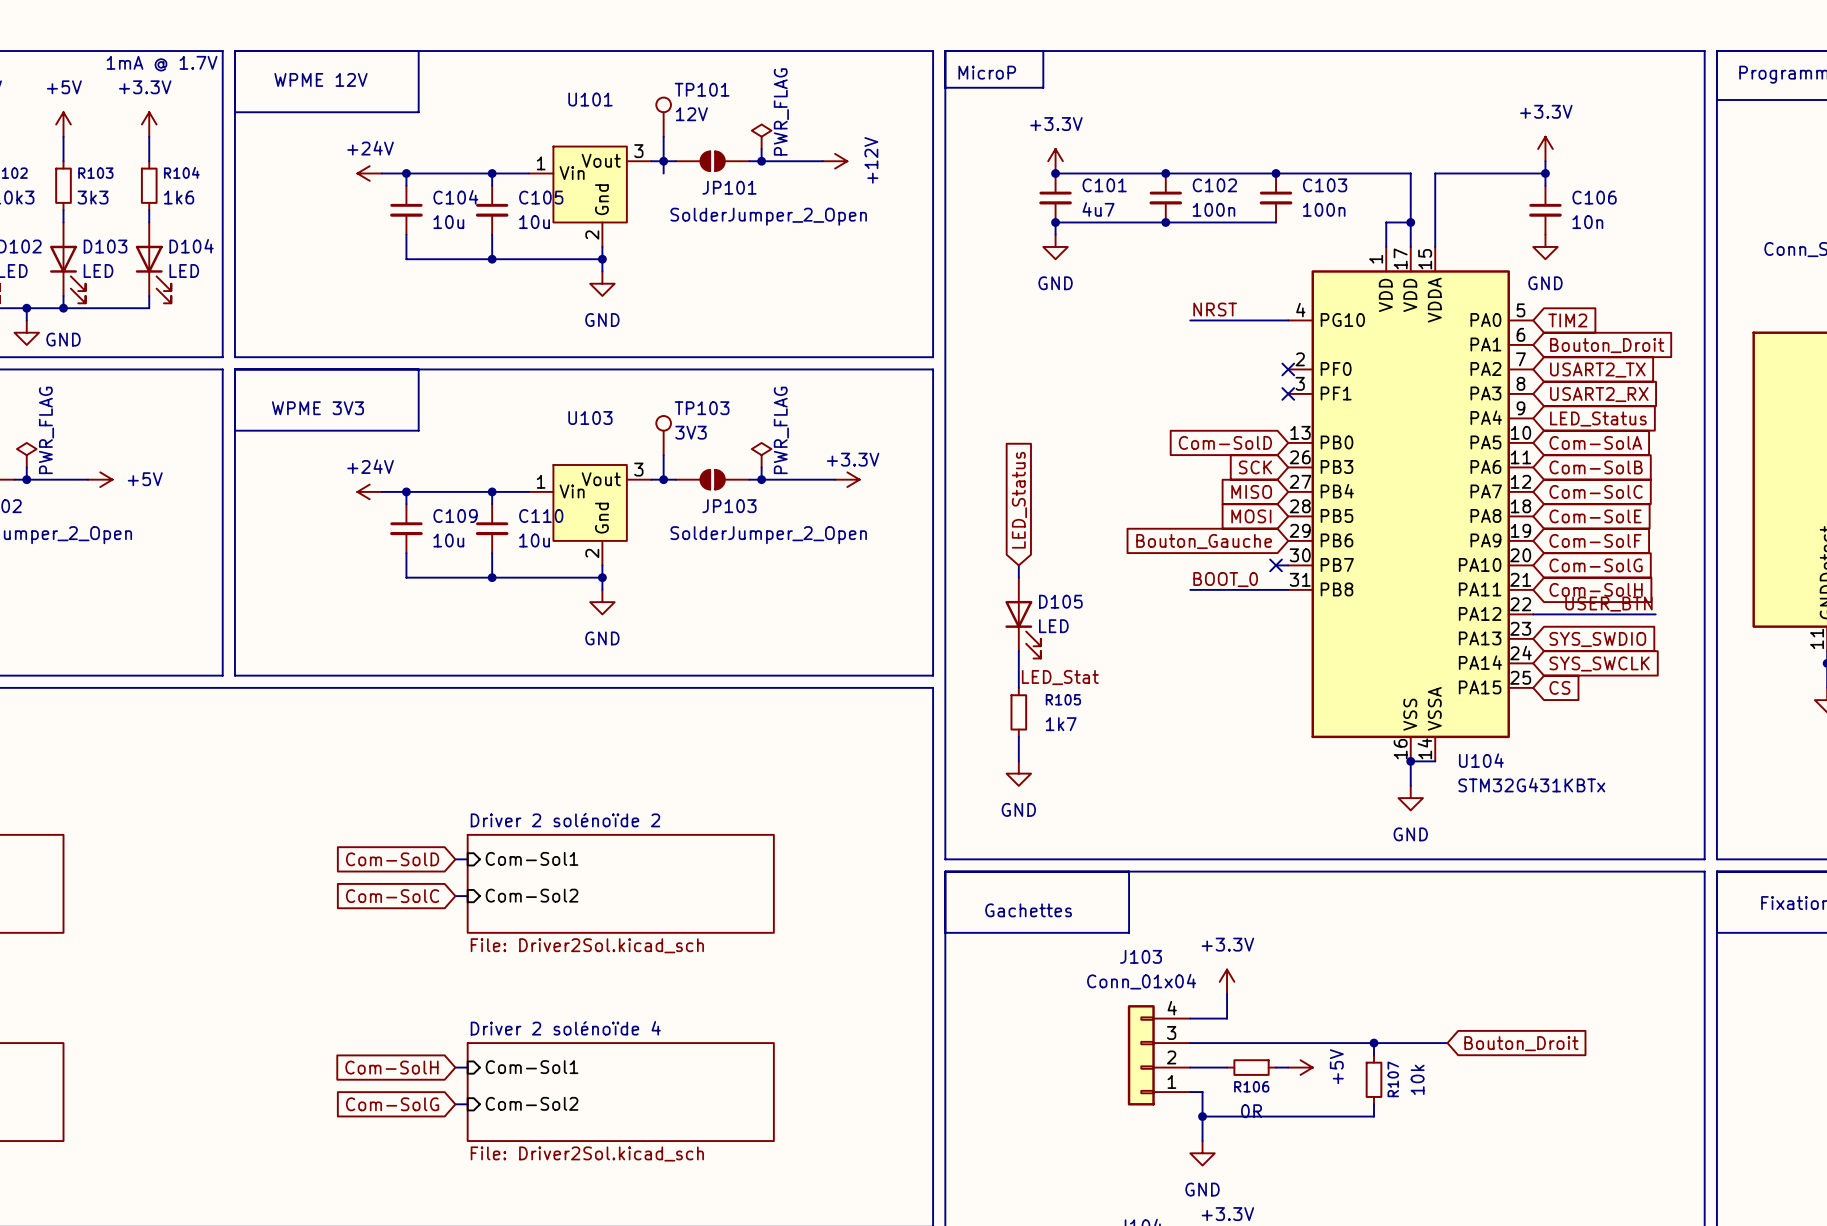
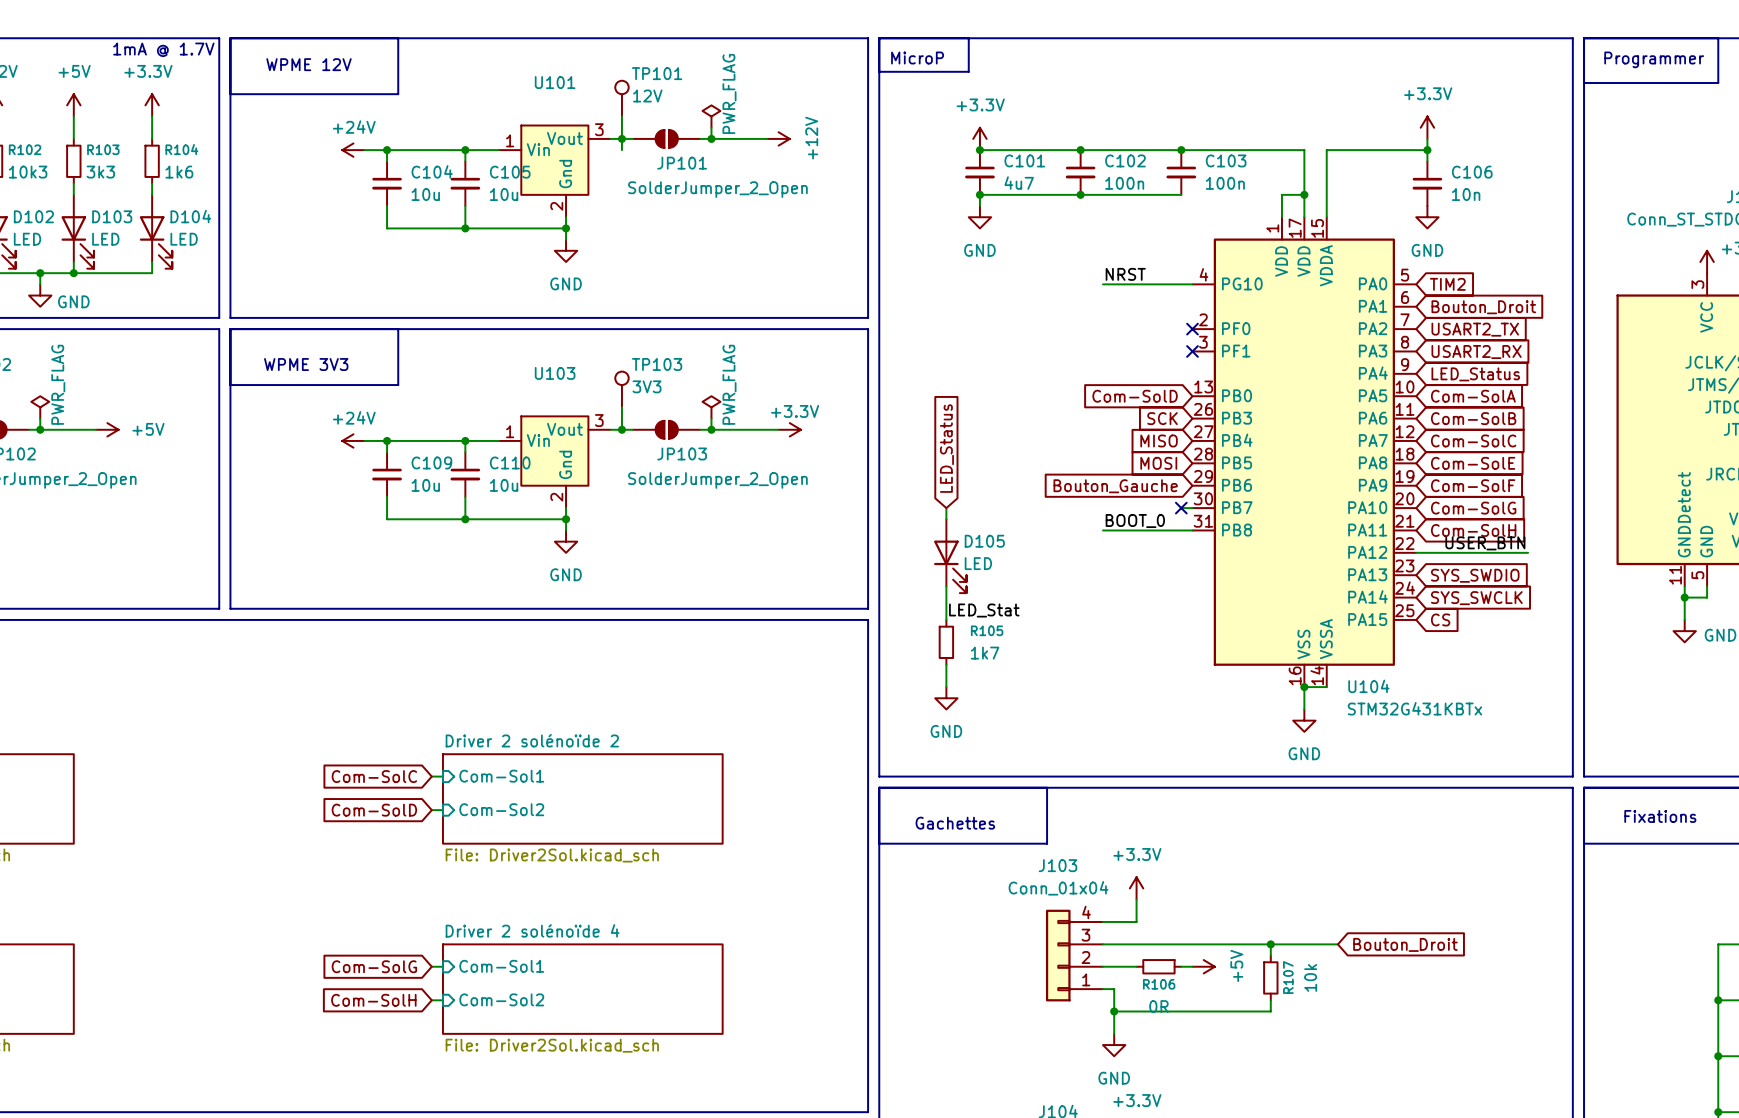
global label: Com-SolD (392, 859) -> Com-SolC (374, 776)
global label: Com-SolC (392, 896) -> Com-SolD (374, 810)
global label: Com-SolH (391, 1067) -> Com-SolG (374, 966)
global label: Com-SolG (392, 1104) -> Com-SolH (373, 1000)

